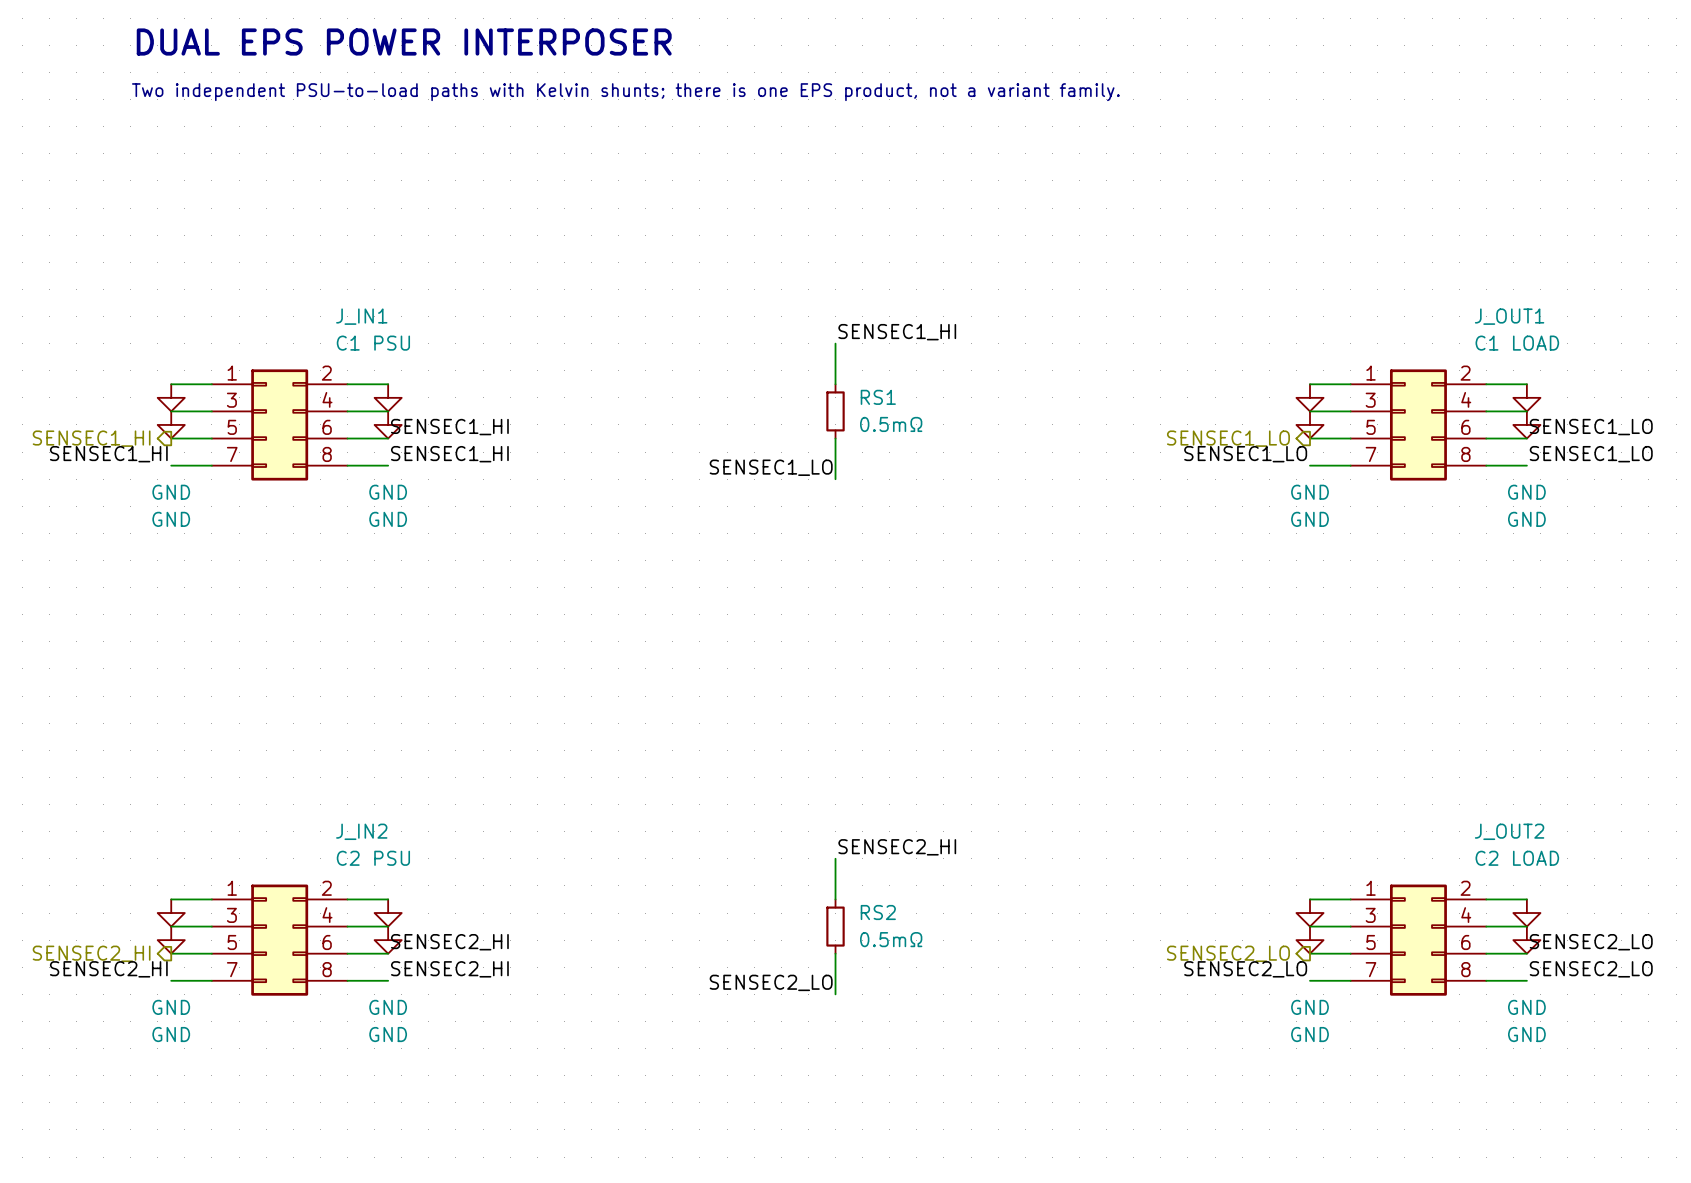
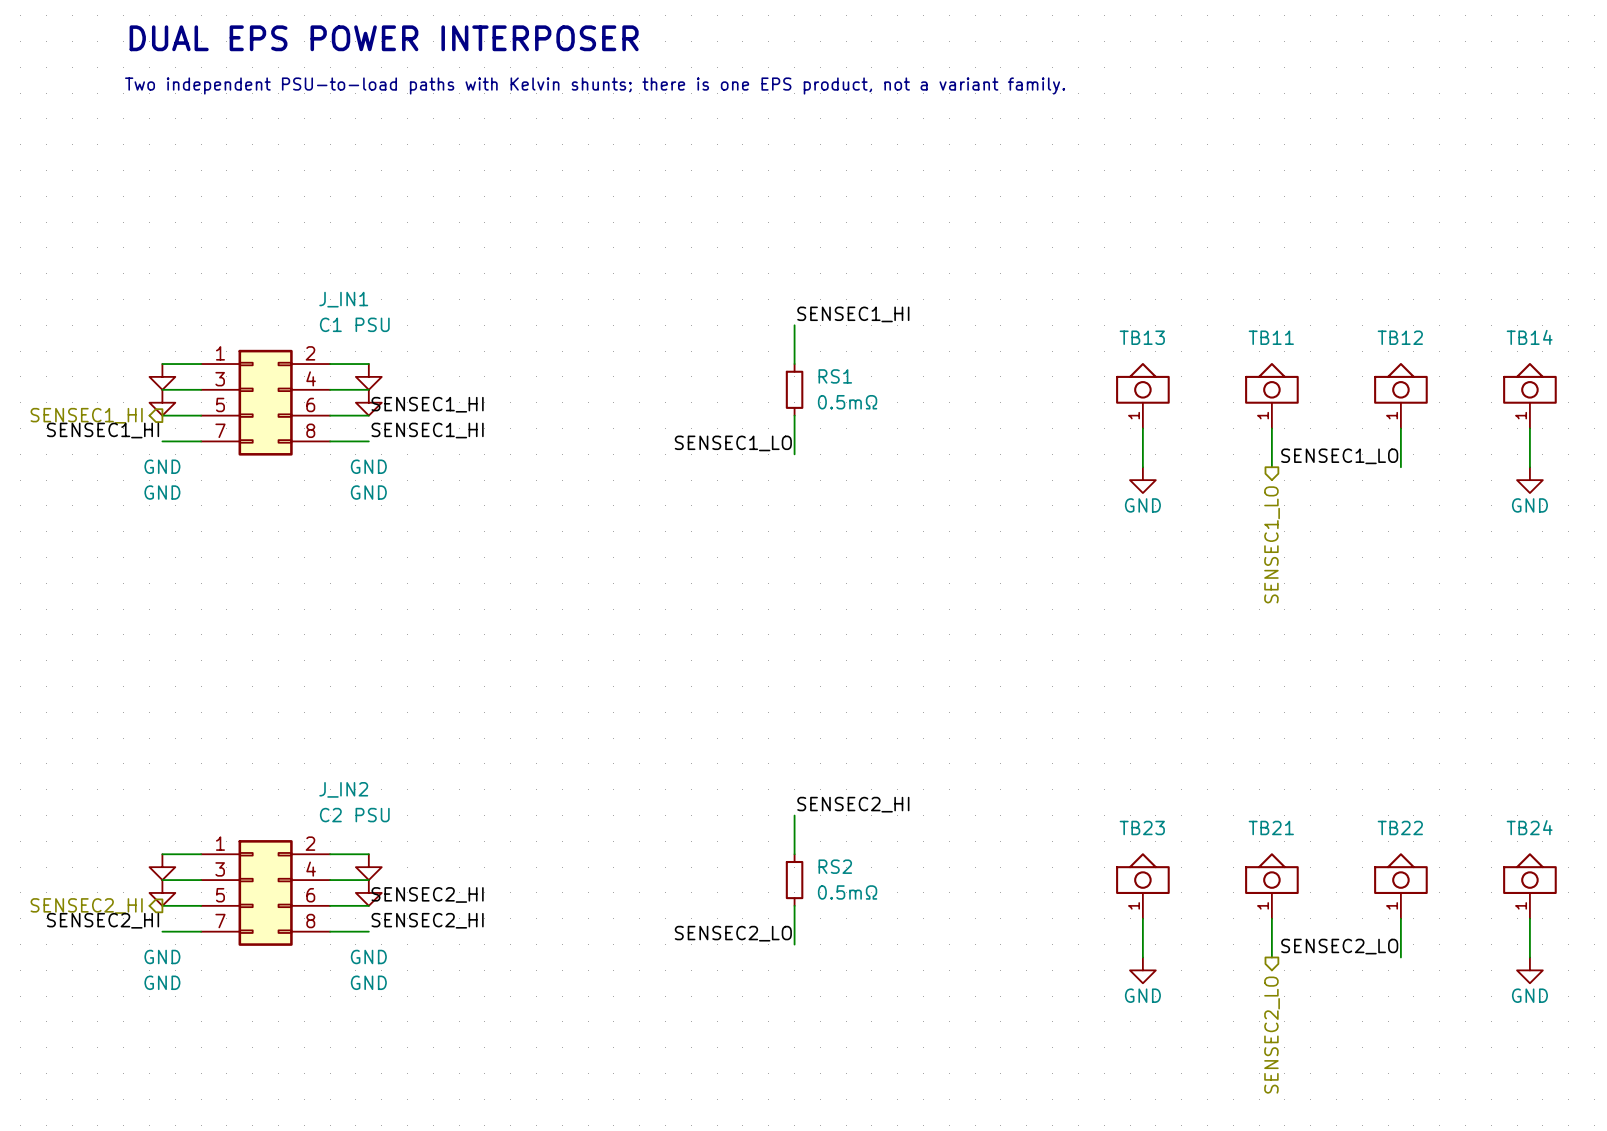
wire: (1310, 384) (1350, 384) -> none
wire: (1486, 384) (1526, 384) -> none
power symbol: GND (1310, 397) -> none
power symbol: GND (1526, 397) -> none
wire: (1310, 411) (1350, 411) -> none
wire: (1486, 411) (1526, 411) -> none
TB13: none -> (1142, 395)
TB11: none -> (1271, 395)
TB12: none -> (1400, 395)
TB14: none -> (1529, 395)
power symbol: GND (1310, 424) -> none
J_OUT1: C1 LOAD (1418, 424) -> none
power symbol: GND (1526, 424) -> none
label: SENSEC1_LO (1591, 427) -> none
hierarchical label rotation: 0° (1228, 438) -> 90° counterclockwise (1272, 544)
hierarchical label position: SENSEC1_LO (1228, 438) -> SENSEC1_LO (1272, 544)
wire: (1310, 438) (1350, 438) -> none
wire: (1486, 438) (1526, 438) -> none
wire: none -> (1142, 428) (1142, 467)
wire: none -> (1271, 428) (1271, 467)
wire: none -> (1400, 428) (1400, 467)
wire: none -> (1529, 428) (1529, 467)
label: SENSEC1_LO (1245, 454) -> none
label: SENSEC1_LO (1591, 454) -> none
wire: (1310, 465) (1350, 465) -> none
wire: (1486, 465) (1526, 465) -> none
label: none -> SENSEC1_LO (1339, 456)
power symbol: none -> GND (1142, 480)
power symbol: none -> GND (1529, 480)
wire: (1310, 899) (1350, 899) -> none
wire: (1486, 899) (1526, 899) -> none
power symbol: GND (1310, 913) -> none
power symbol: GND (1526, 913) -> none
wire: (1310, 926) (1350, 926) -> none
wire: (1486, 926) (1526, 926) -> none
TB23: none -> (1142, 886)
TB21: none -> (1271, 886)
TB22: none -> (1400, 886)
TB24: none -> (1529, 886)
power symbol: GND (1310, 940) -> none
J_OUT2: C2 LOAD (1418, 940) -> none
power symbol: GND (1526, 940) -> none
label: SENSEC2_LO (1591, 942) -> none
hierarchical label rotation: 0° (1228, 953) -> 90° counterclockwise (1272, 1035)
hierarchical label position: SENSEC2_LO (1228, 953) -> SENSEC2_LO (1272, 1035)
wire: (1310, 953) (1350, 953) -> none
wire: (1486, 953) (1526, 953) -> none
wire: none -> (1142, 918) (1142, 957)
wire: none -> (1271, 918) (1271, 957)
wire: none -> (1400, 918) (1400, 957)
wire: none -> (1529, 918) (1529, 957)
label: SENSEC2_LO (1245, 969) -> none
label: SENSEC2_LO (1591, 969) -> none
wire: (1310, 980) (1350, 980) -> none
wire: (1486, 980) (1526, 980) -> none
label: none -> SENSEC2_LO (1339, 946)
power symbol: none -> GND (1142, 970)
power symbol: none -> GND (1529, 970)

